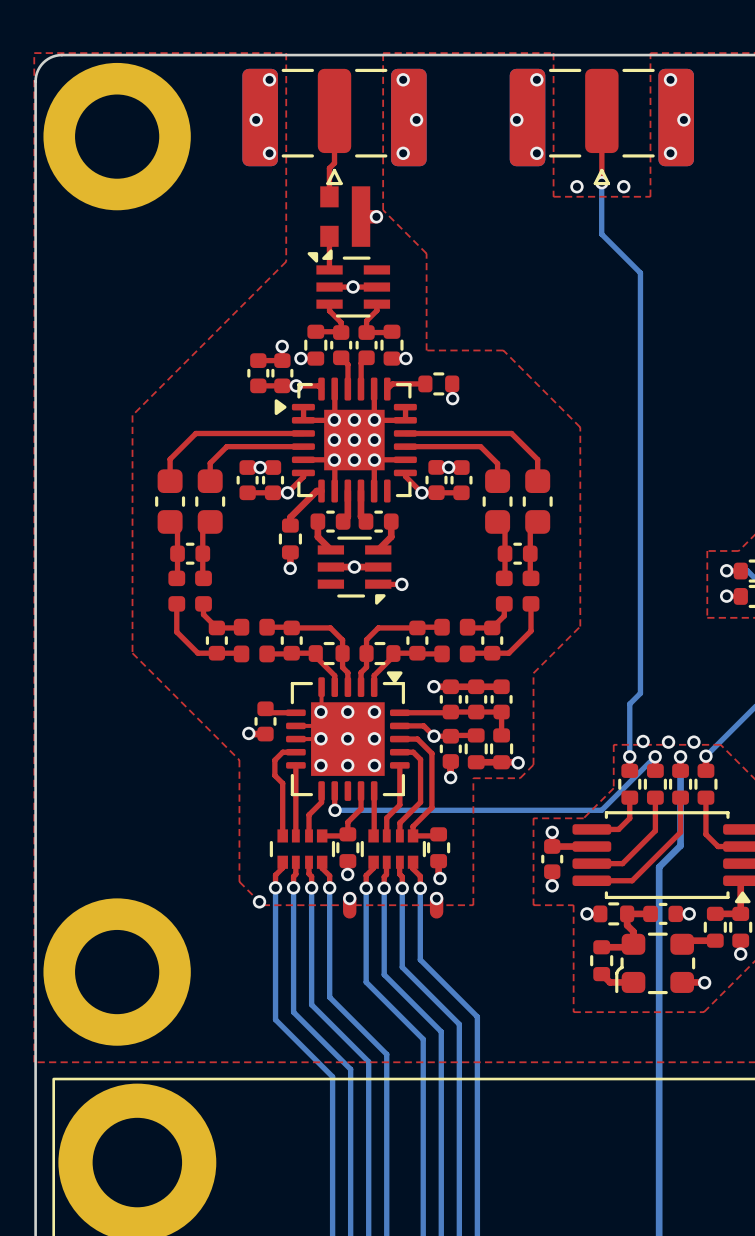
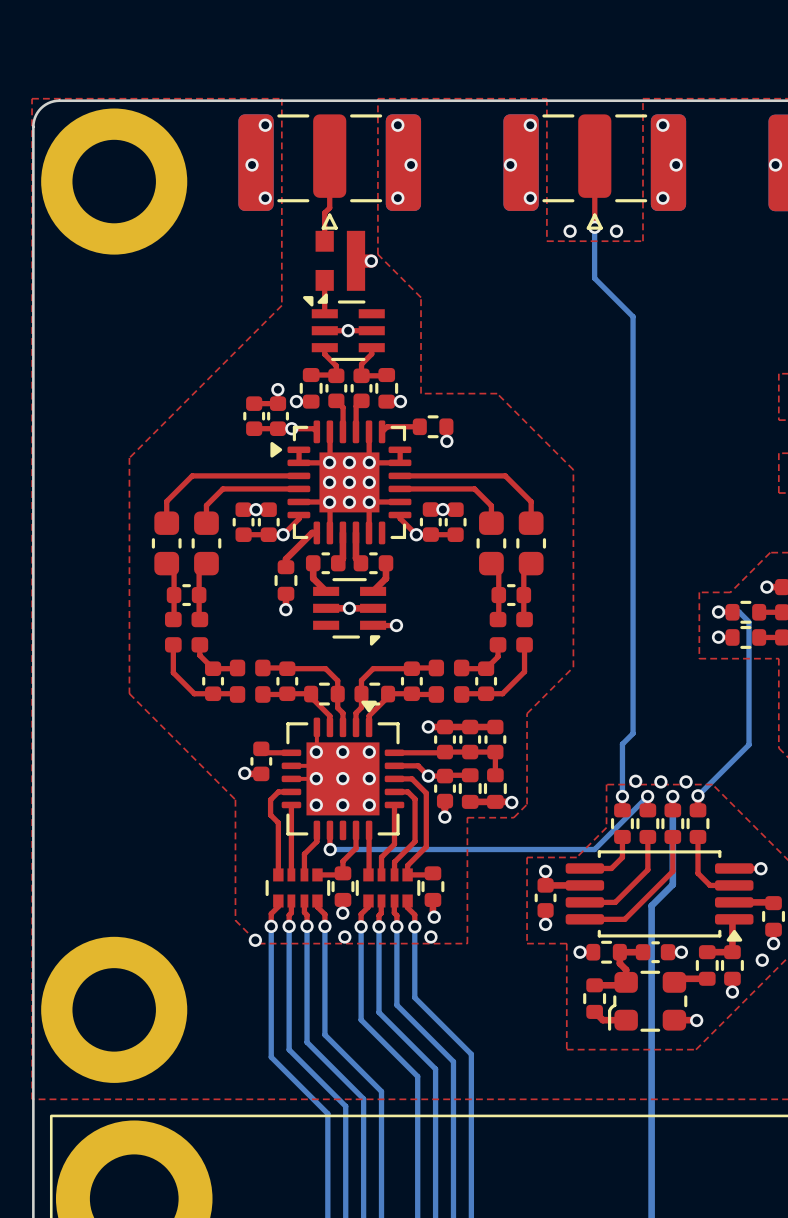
part footprint: [286, 671, 410, 801] -> [281, 700, 405, 841]
top track: (349, 898) (349, 911) -> none
top track: (436, 898) (436, 911) -> none

